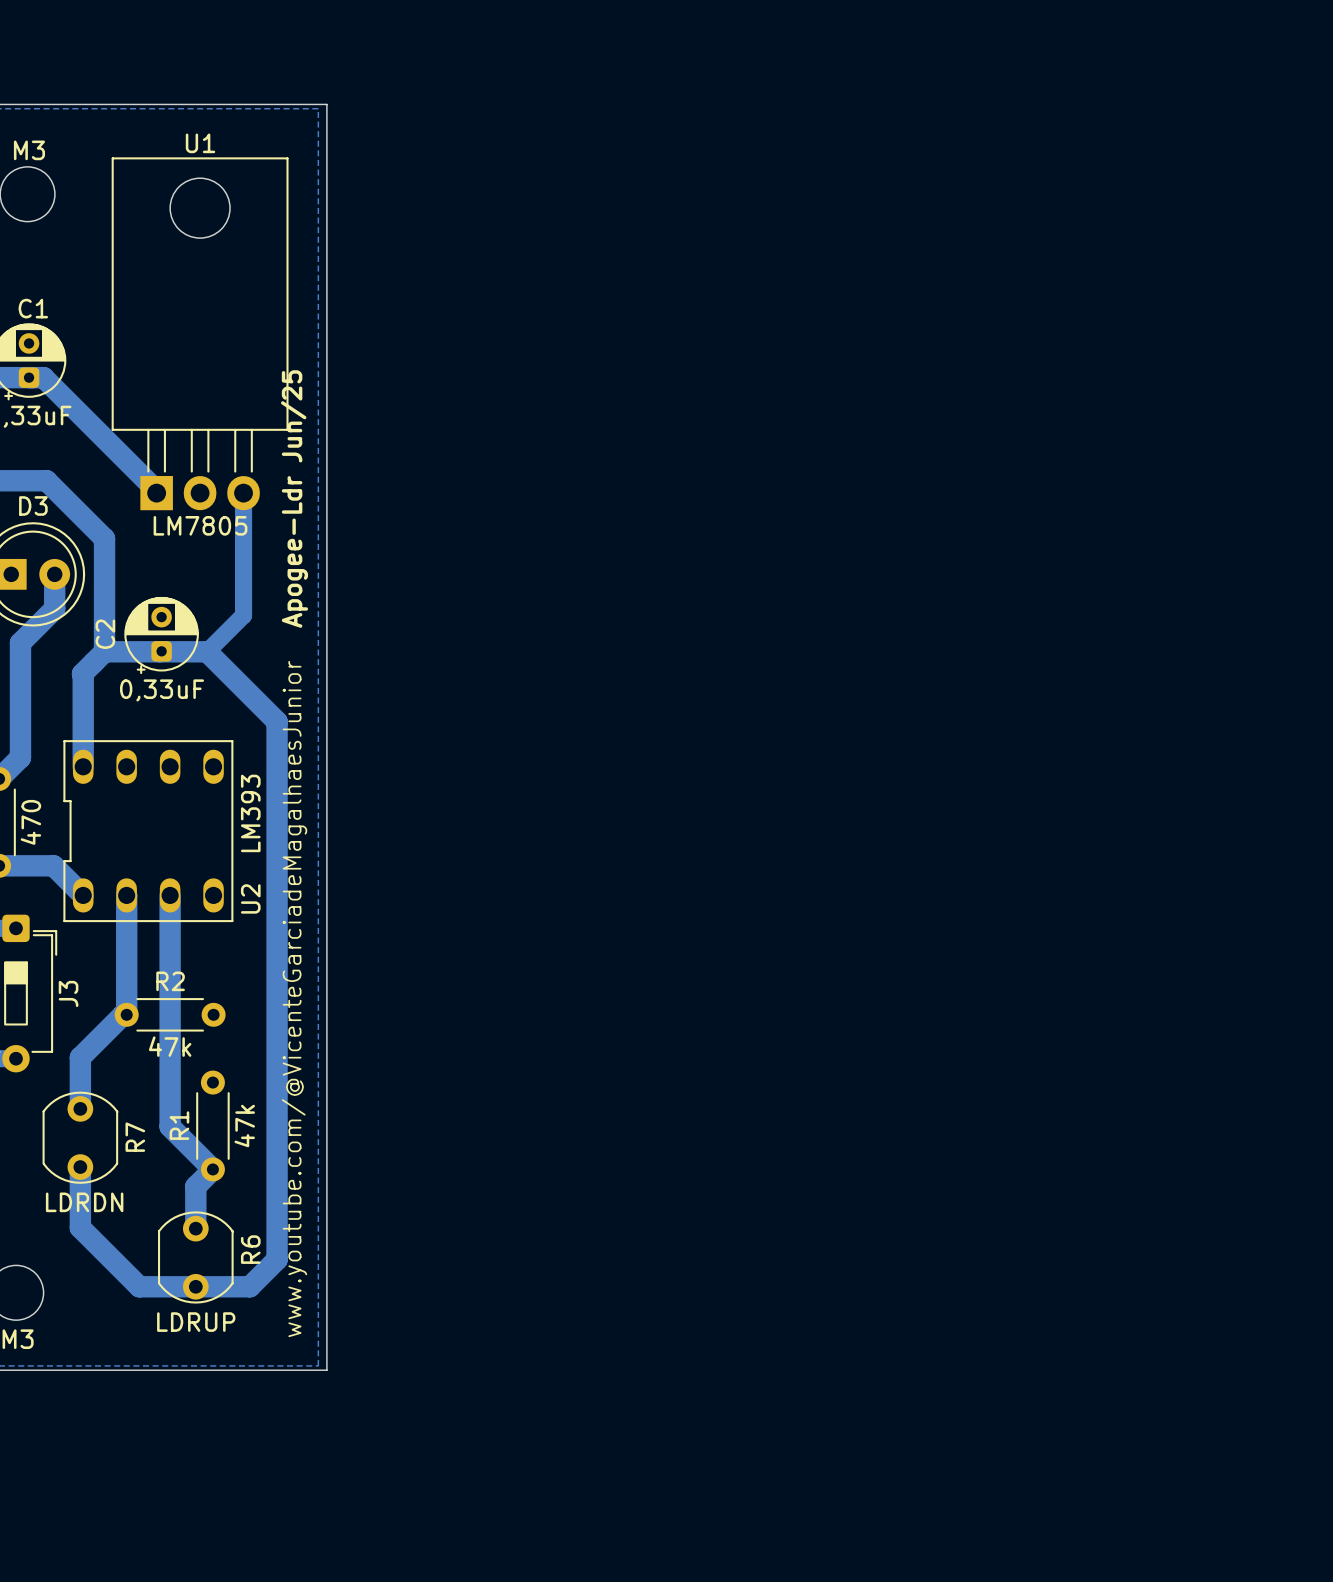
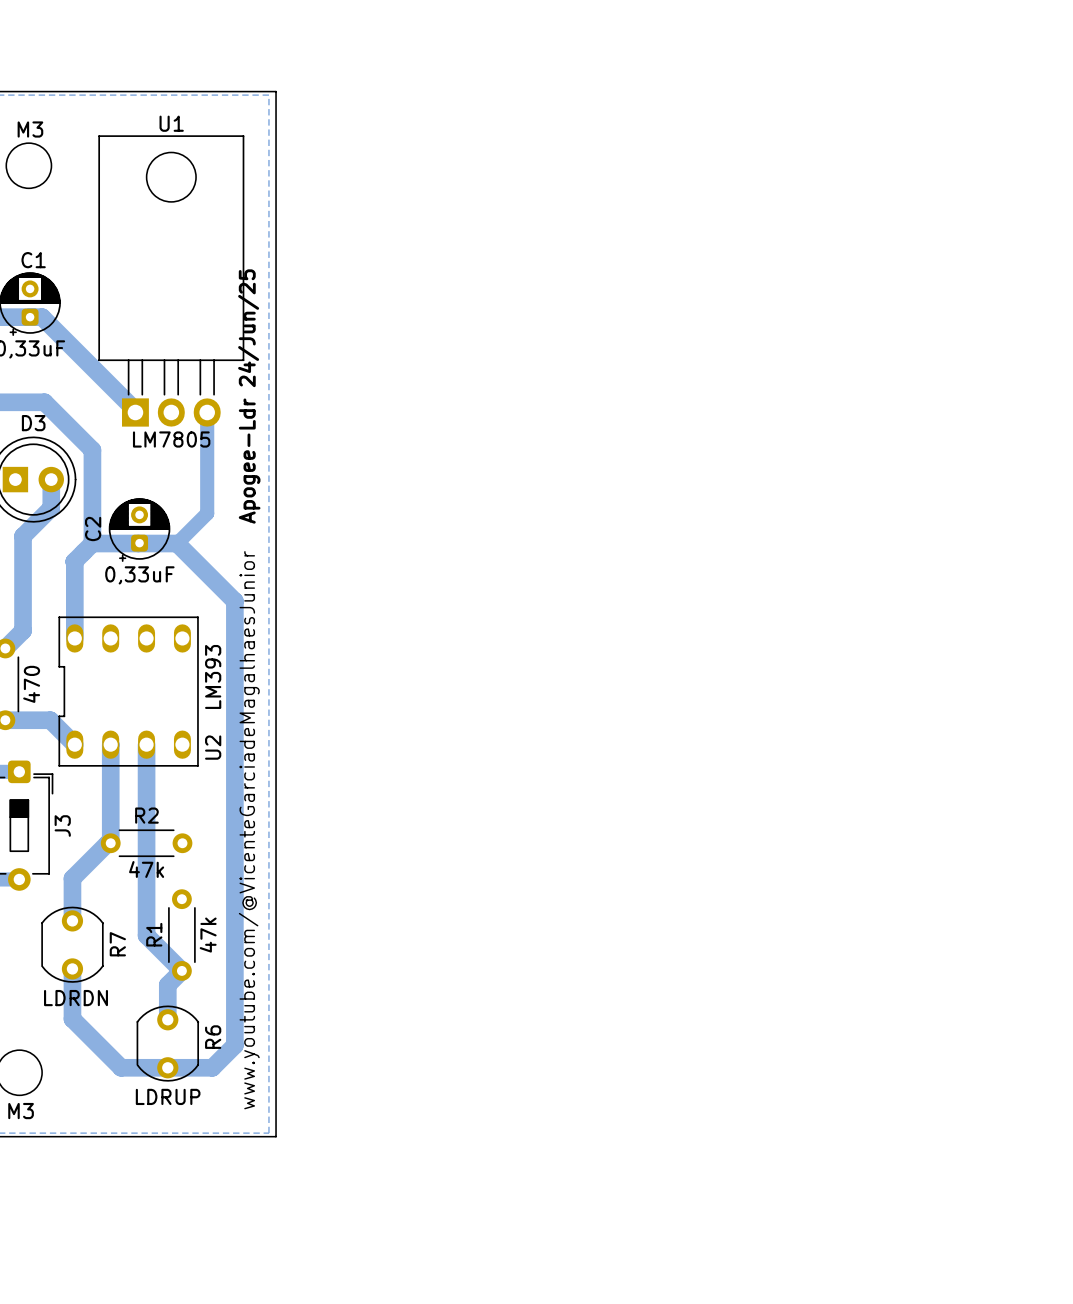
text: Apogee-Ldr Jun/25 (294, 499) -> Apogee-Ldr 24/Jun/25 (249, 396)

